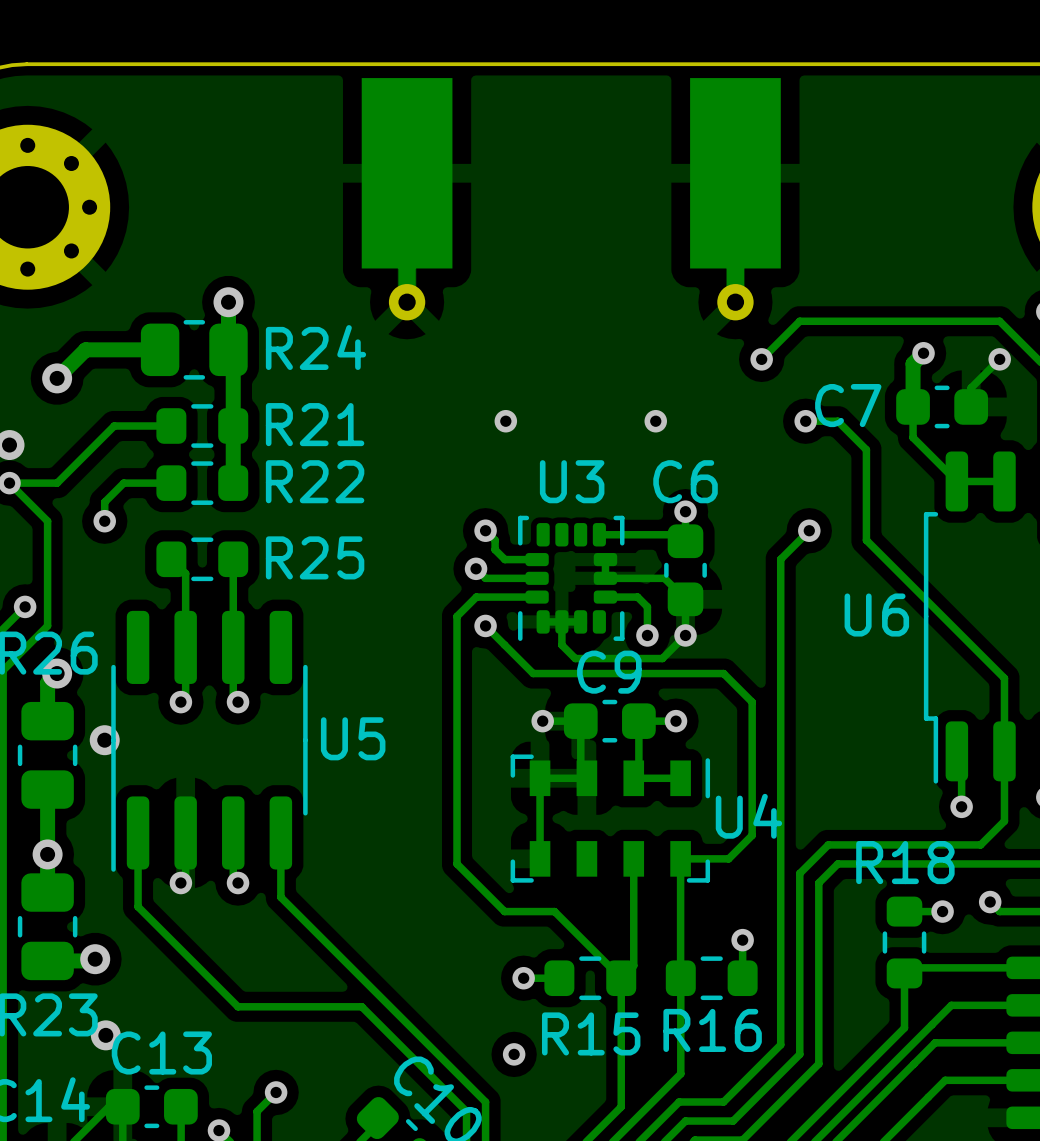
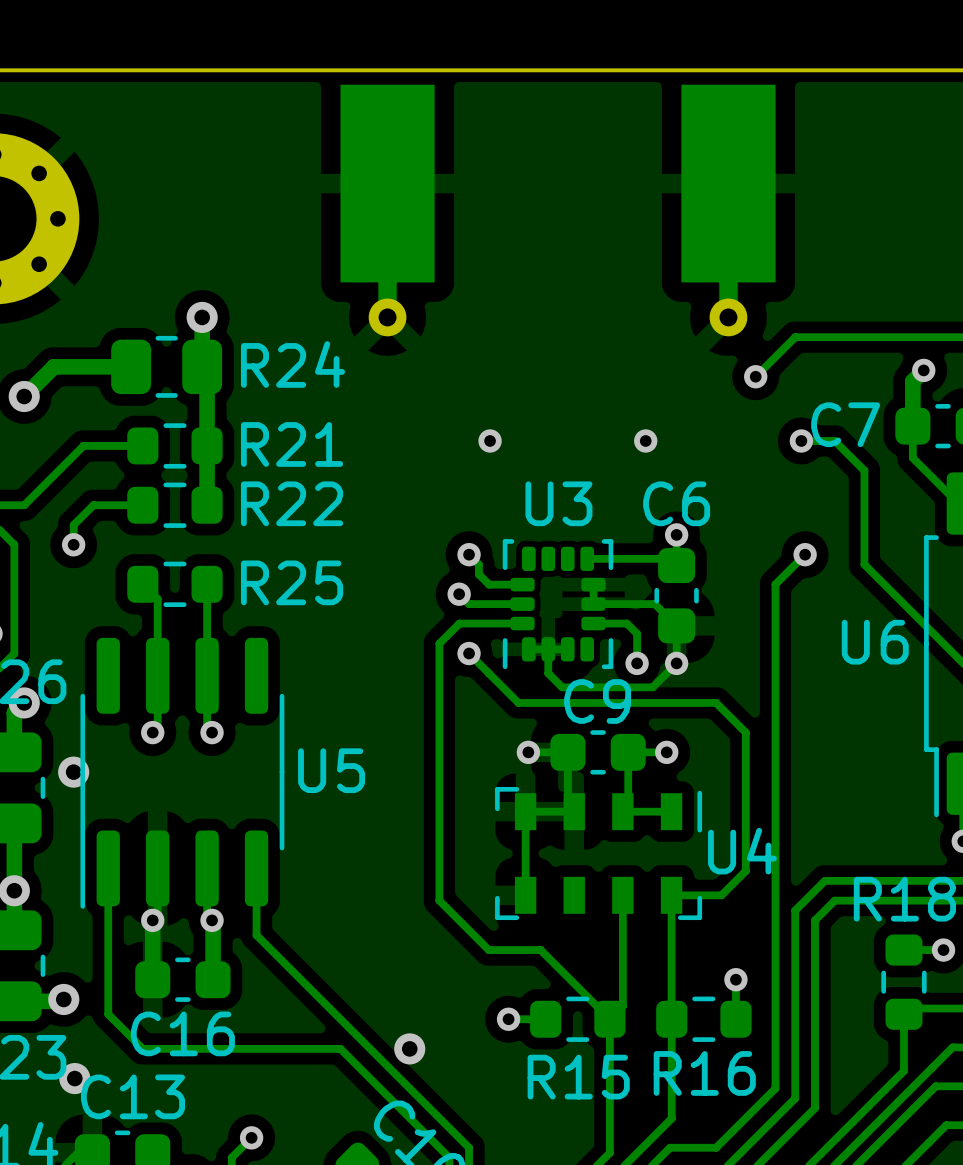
track: none -> (152, 920) (152, 979)
track: none -> (212, 920) (213, 979)
track: (138, 906) (238, 1006) -> (108, 945) (108, 1014) (142, 1048) (212, 1048)
C16: none -> (182, 979)
via: none -> (409, 1048)
via: (514, 1054) -> none

